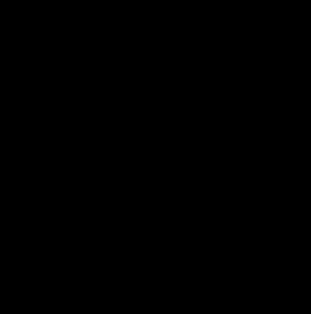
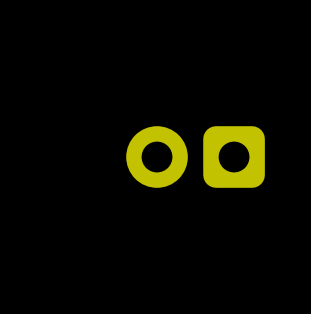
part: none -> (195, 157)

